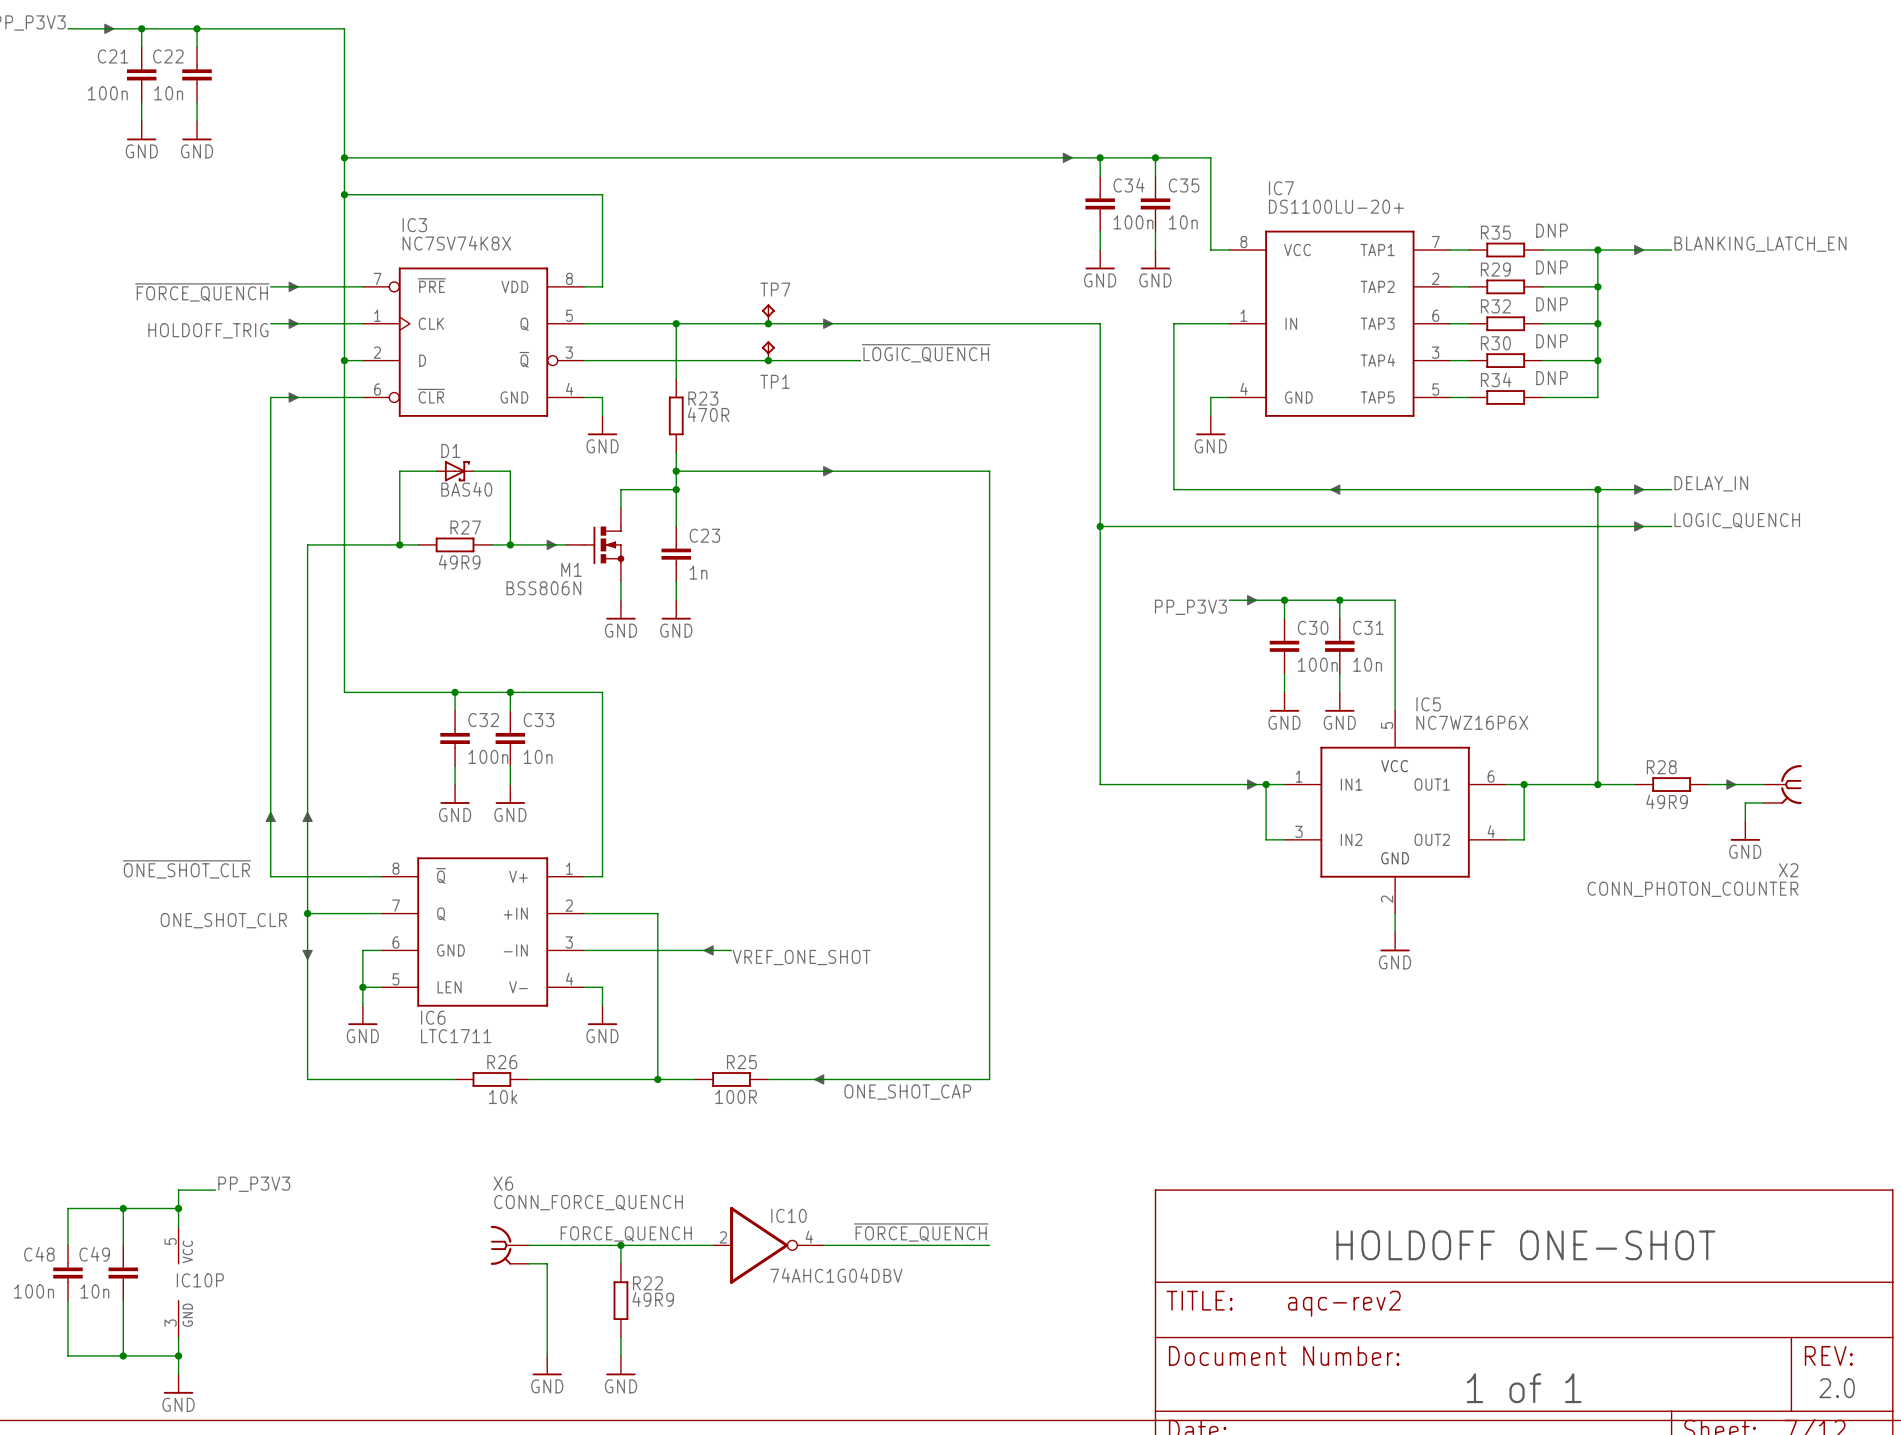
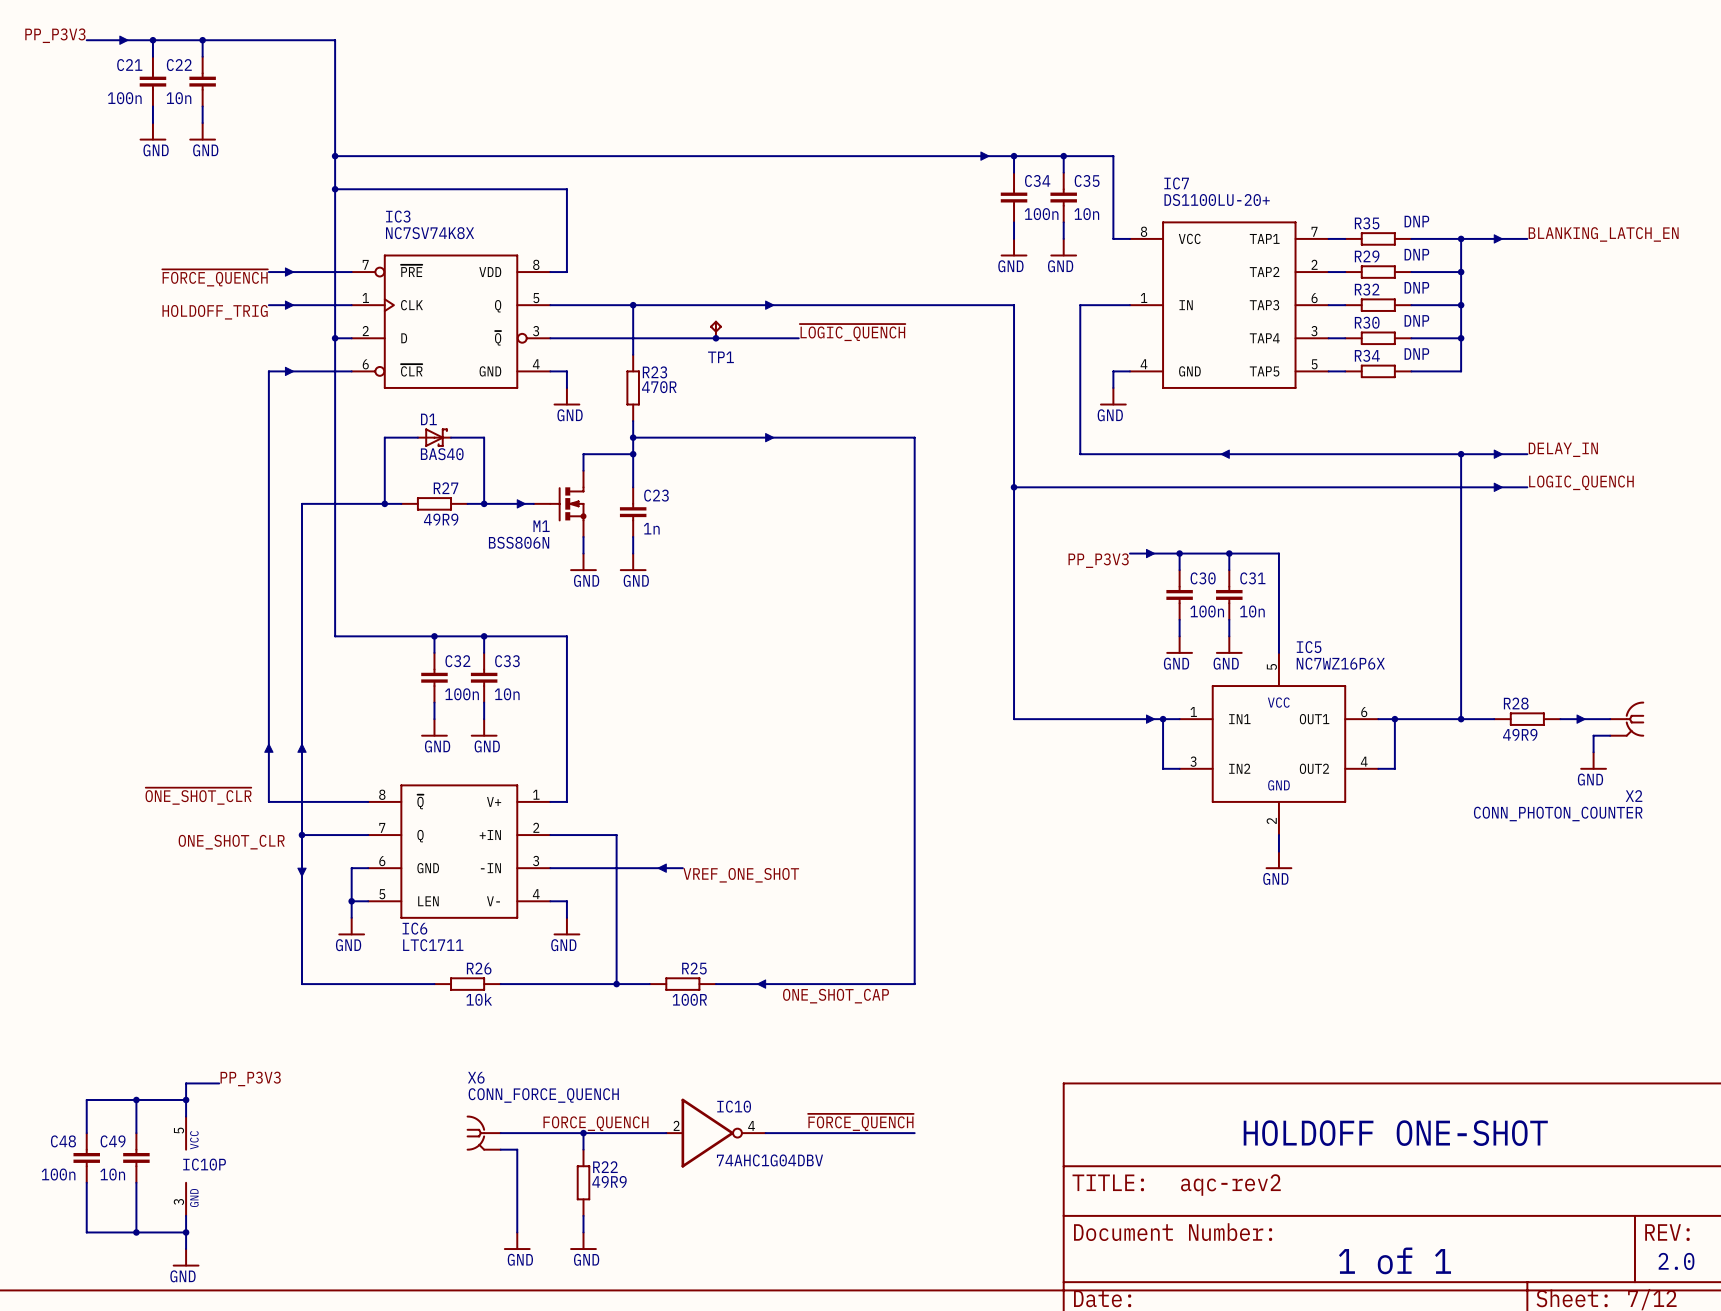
TP7: (768, 314) -> none
junction: (768, 323) -> none

